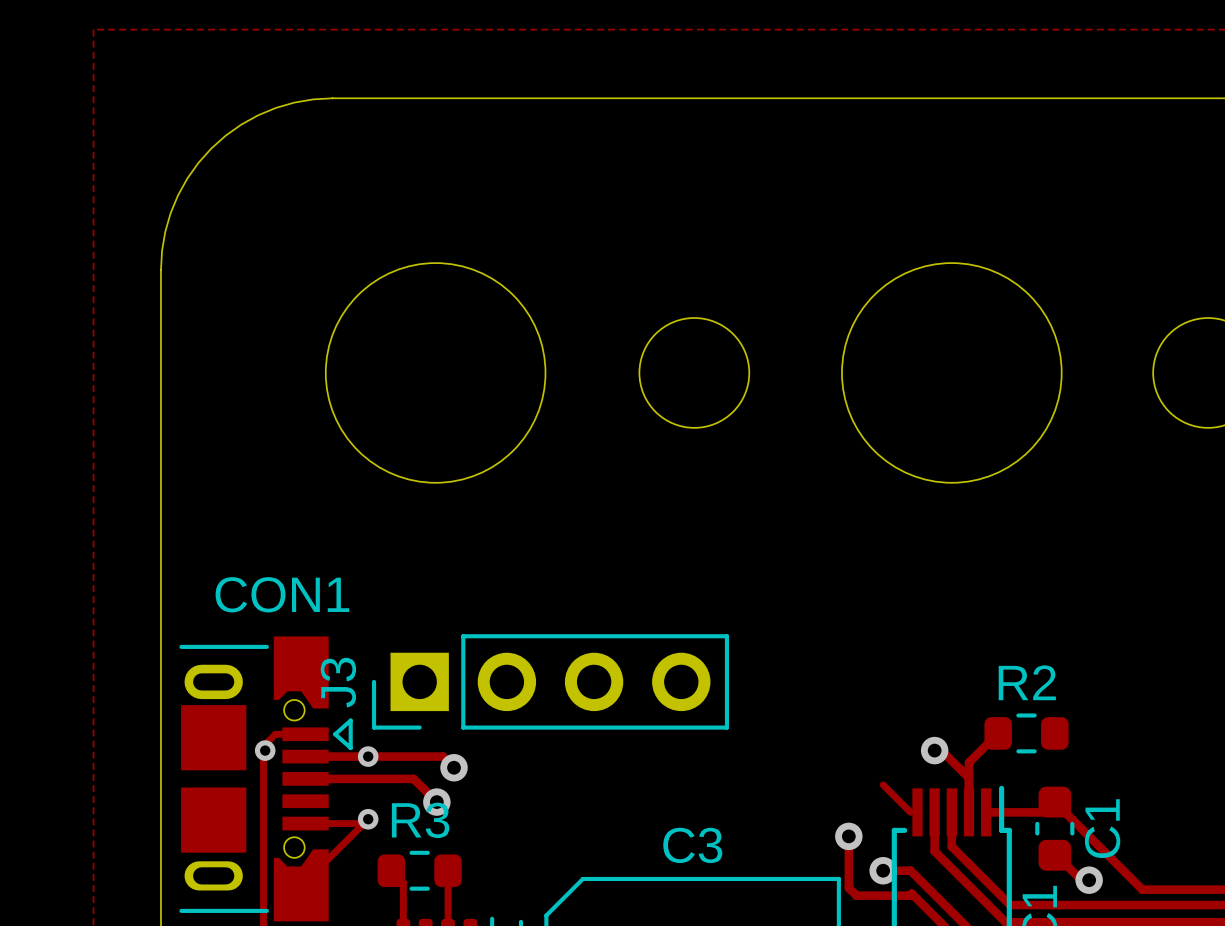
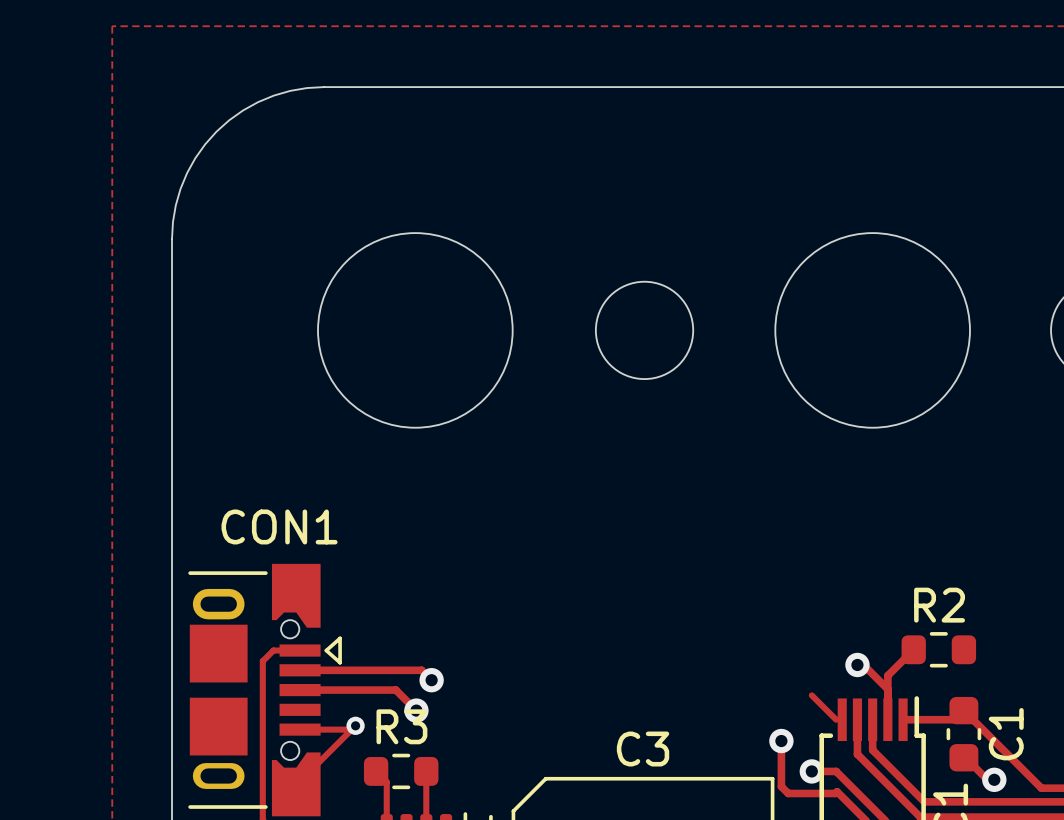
J3: (550, 681) -> none
via: (265, 750) -> none
via: (368, 756) -> none

